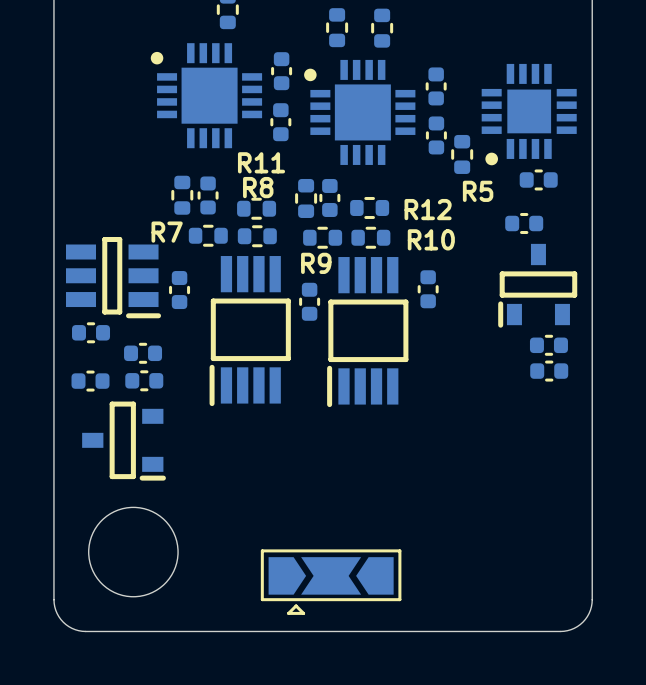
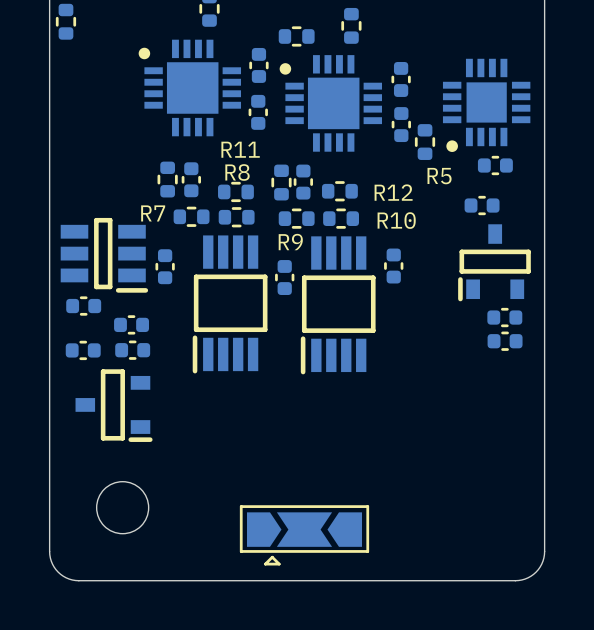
part: none -> (65, 21)
part rotation: 0° (337, 27) -> 90° clockwise (296, 36)
round board edge size: [88, 507, 179, 597] -> [96, 481, 149, 534]

